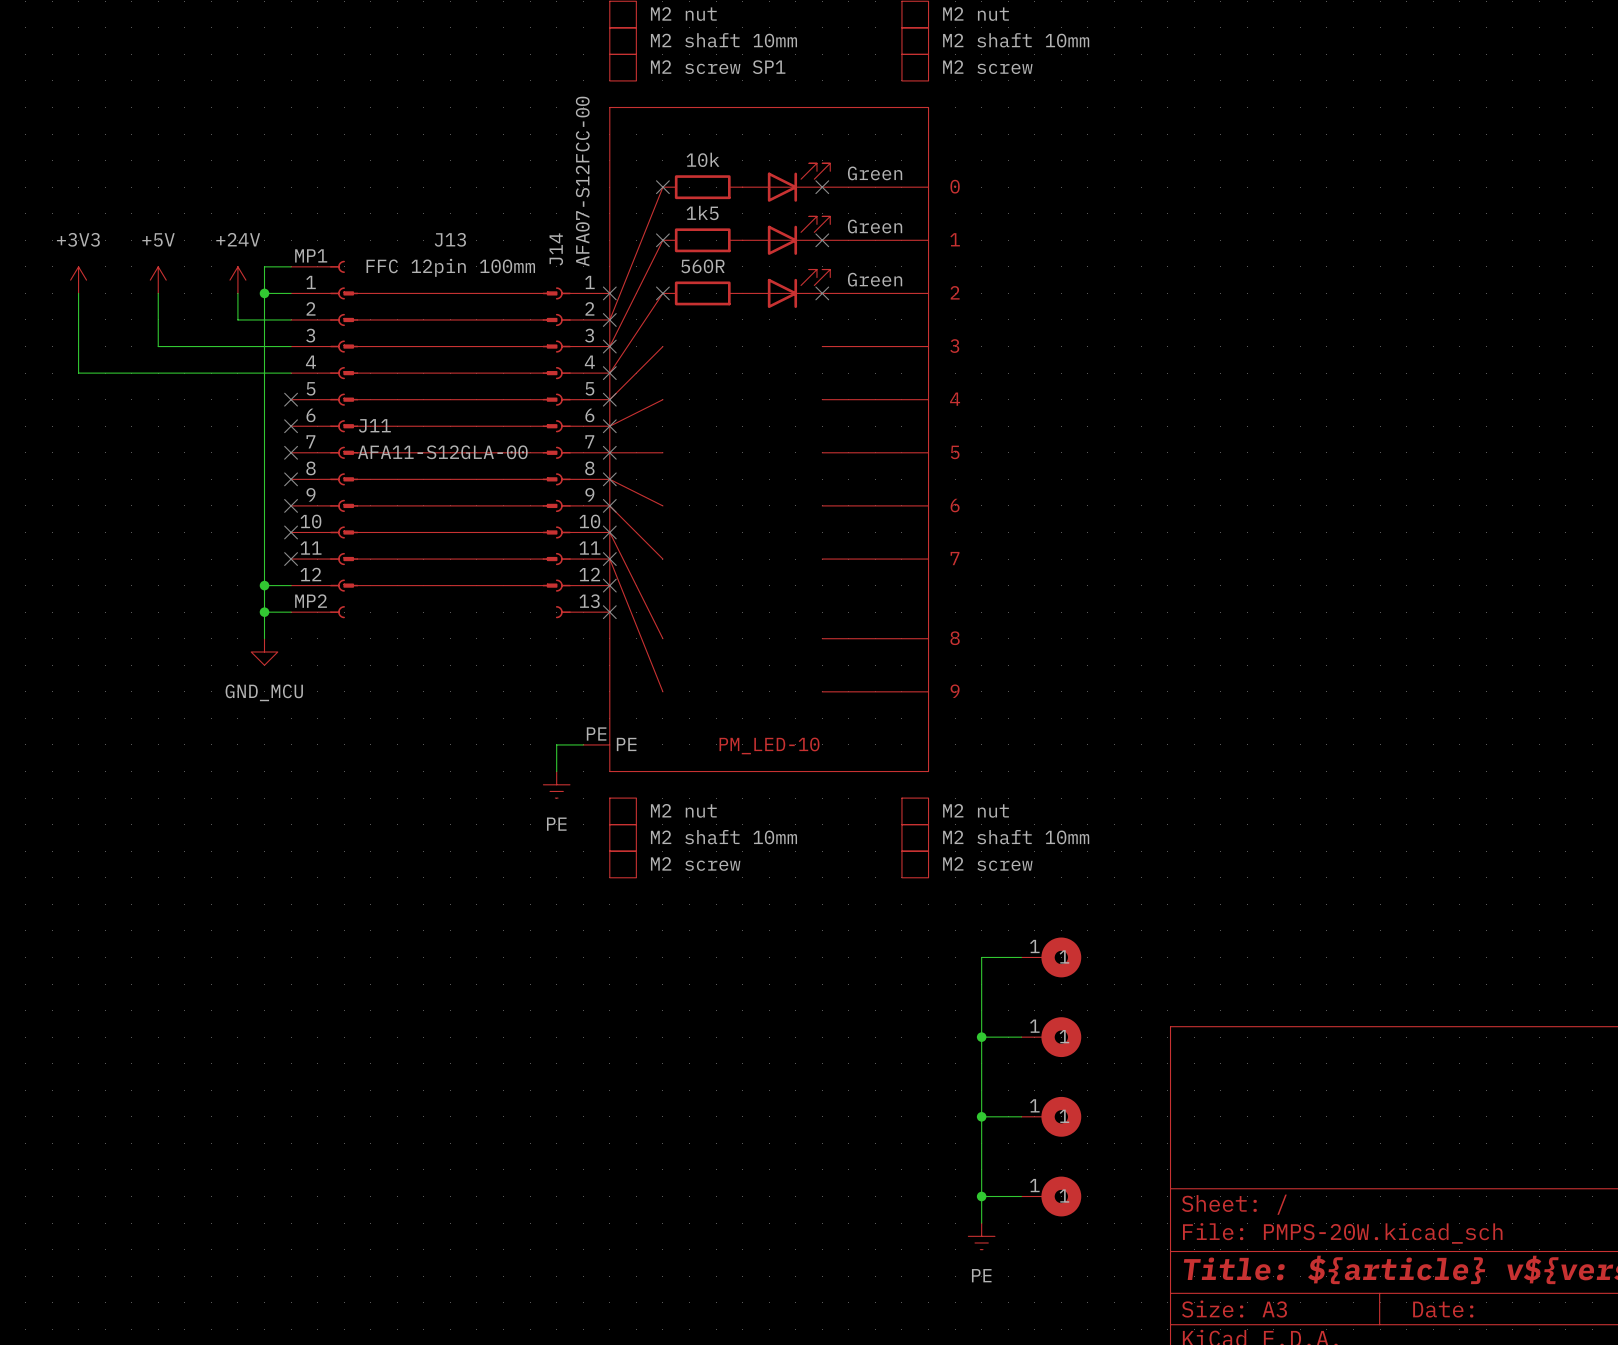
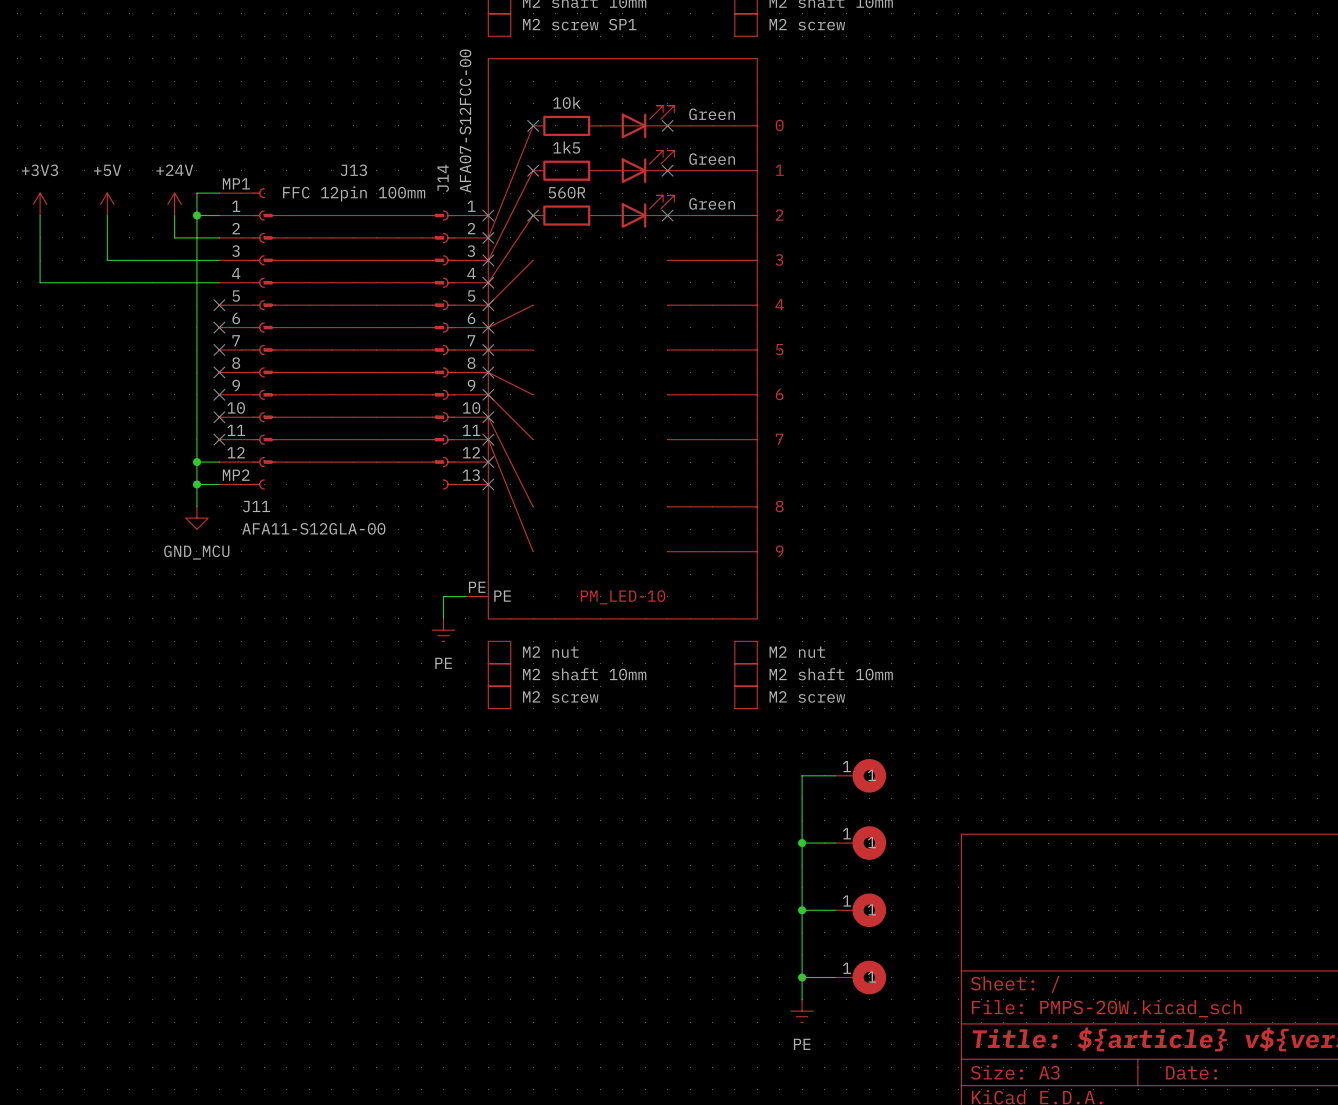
J11 name position: J11 (374, 425) -> J11 (256, 506)
J11 value position: AFA11-S12GLA-00 (442, 452) -> AFA11-S12GLA-00 (313, 528)

